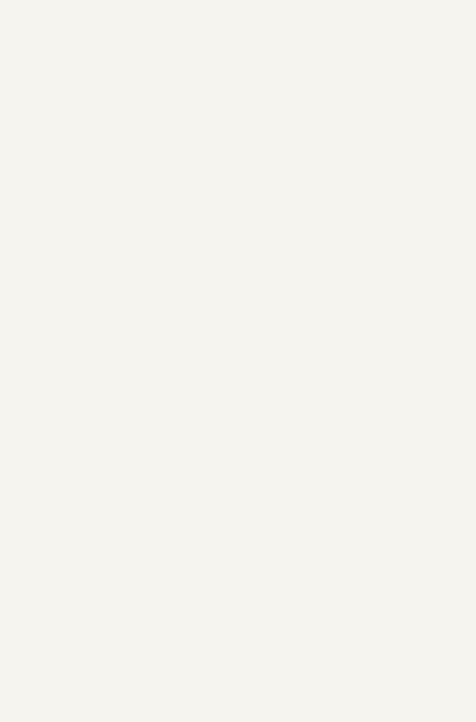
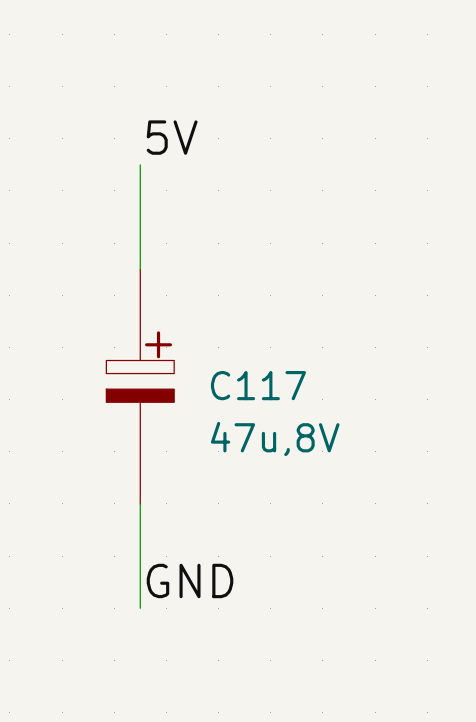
label: none -> 5V (172, 137)
wire: none -> (140, 164) (140, 269)
C117: none -> 47u,8V (140, 386)
wire: none -> (140, 503) (140, 608)
label: none -> GND (190, 580)

